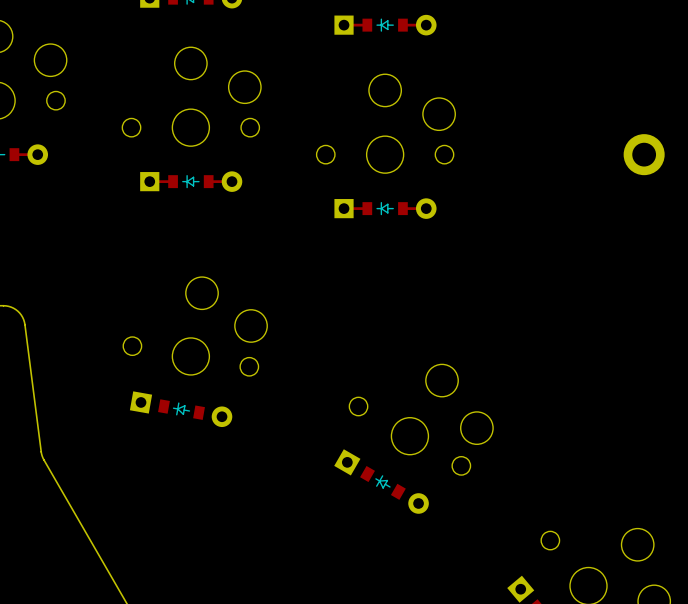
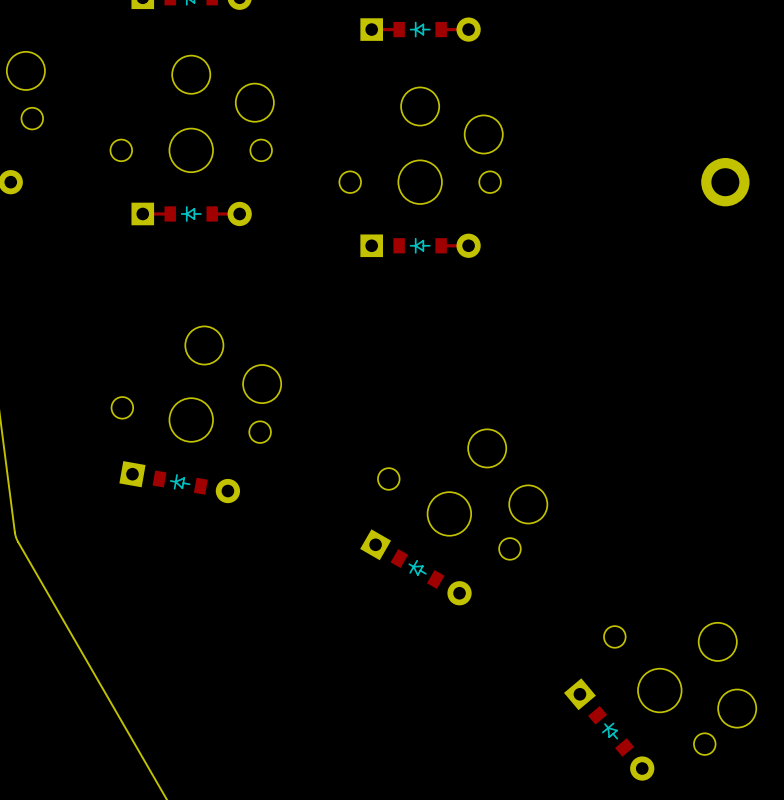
track: (344, 208) (367, 208) -> none

